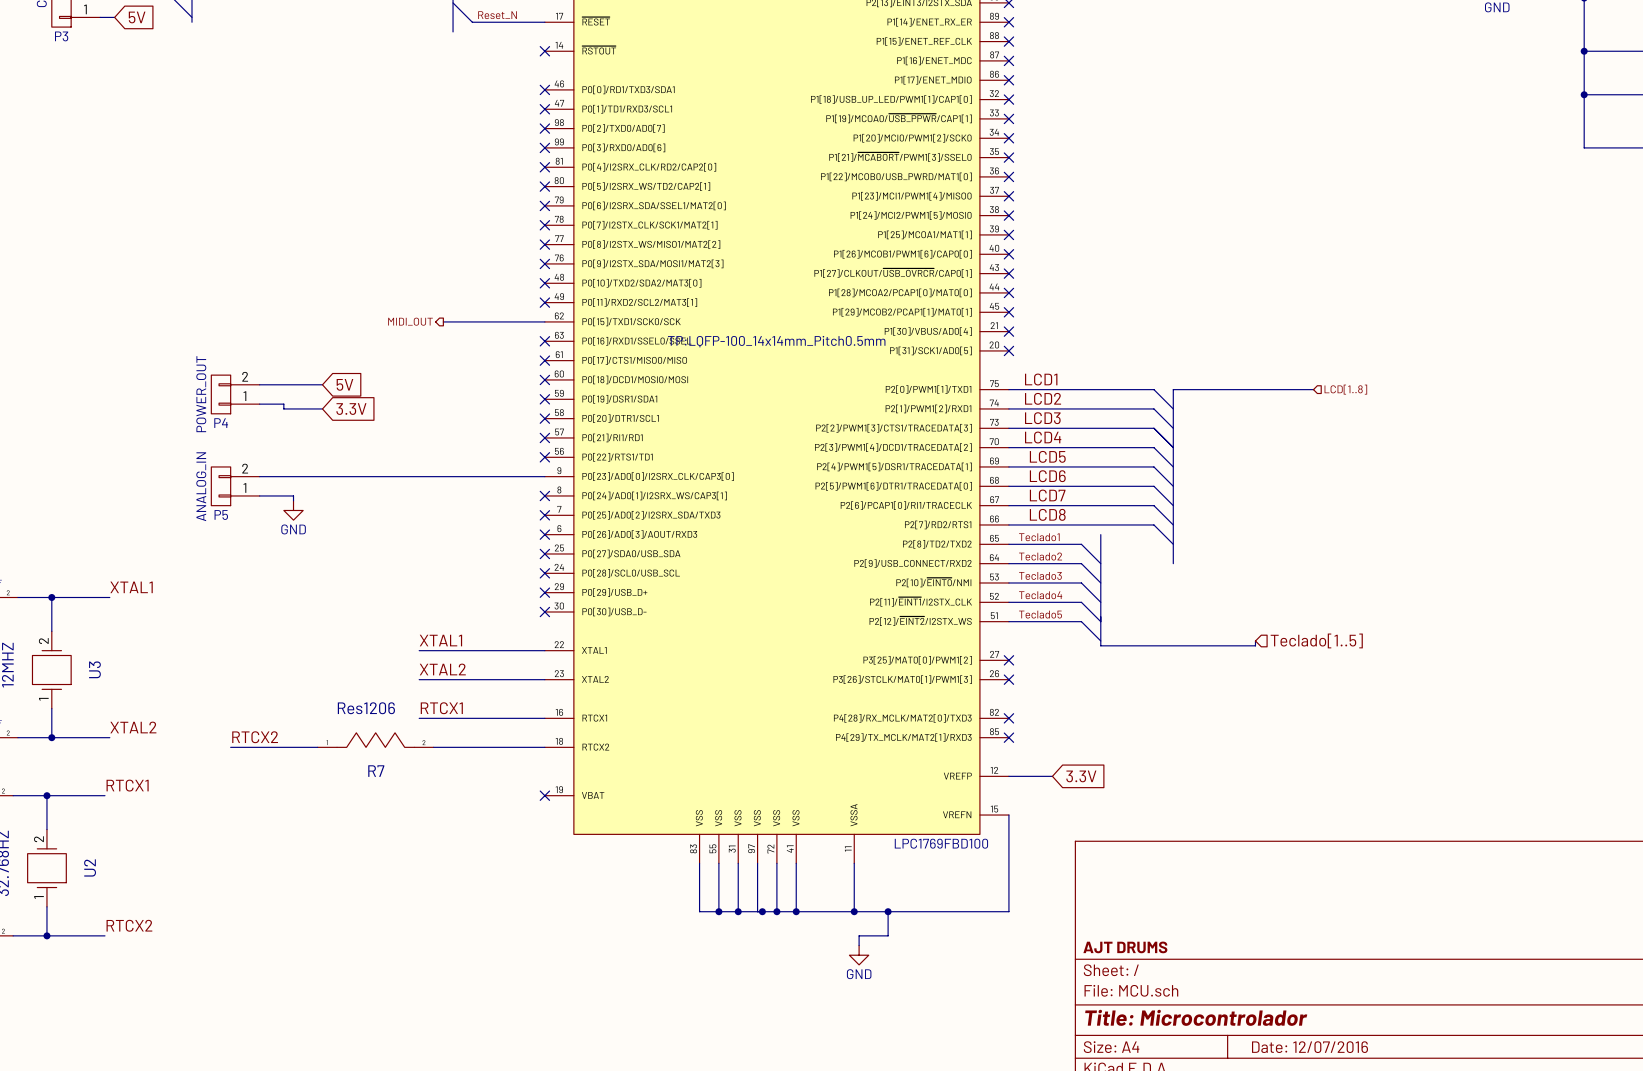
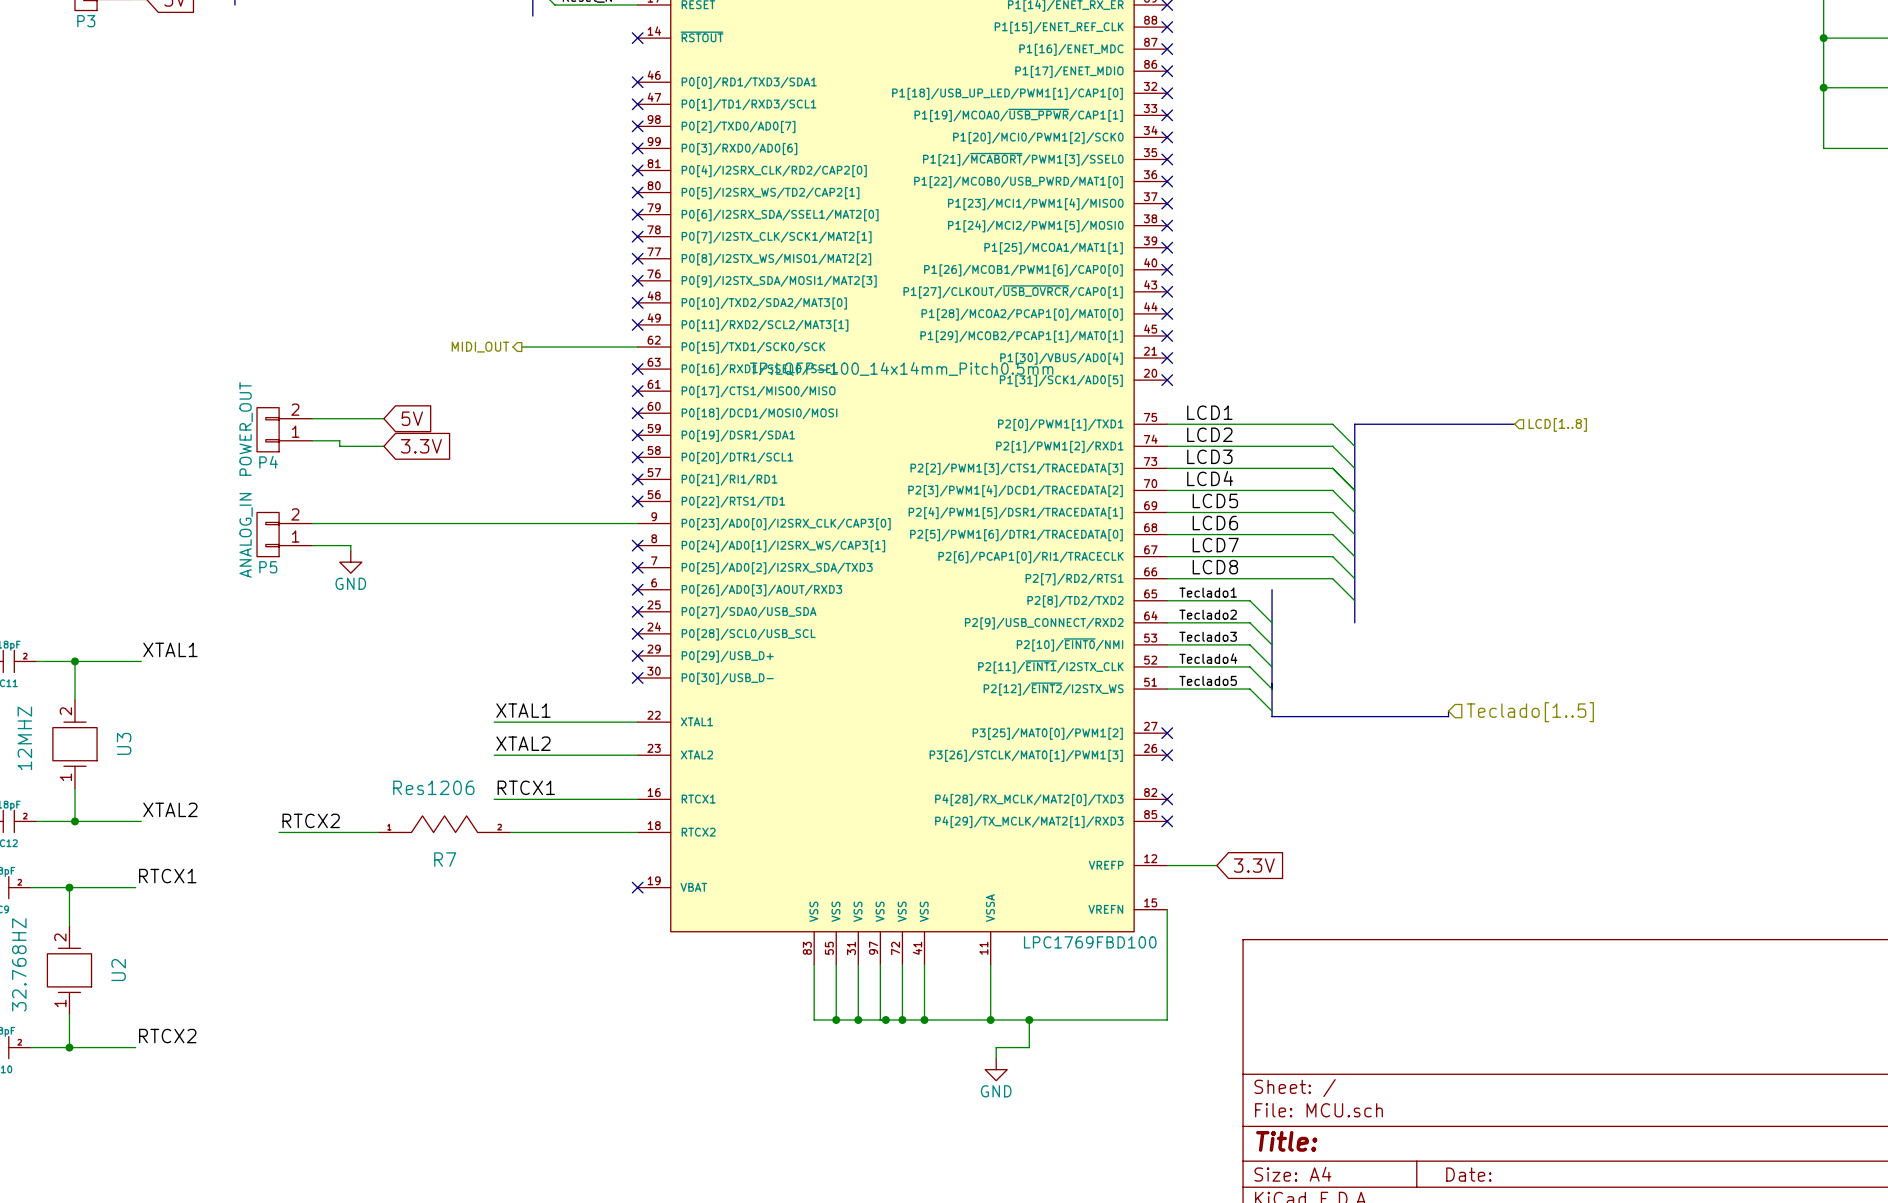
title block: AJT DRUMS (1125, 947) -> none
title block: Title: Microcontrolador (1196, 1017) -> Title: (1286, 1141)
title block: Date: 12/07/2016 (1310, 1047) -> Date: (1468, 1174)

